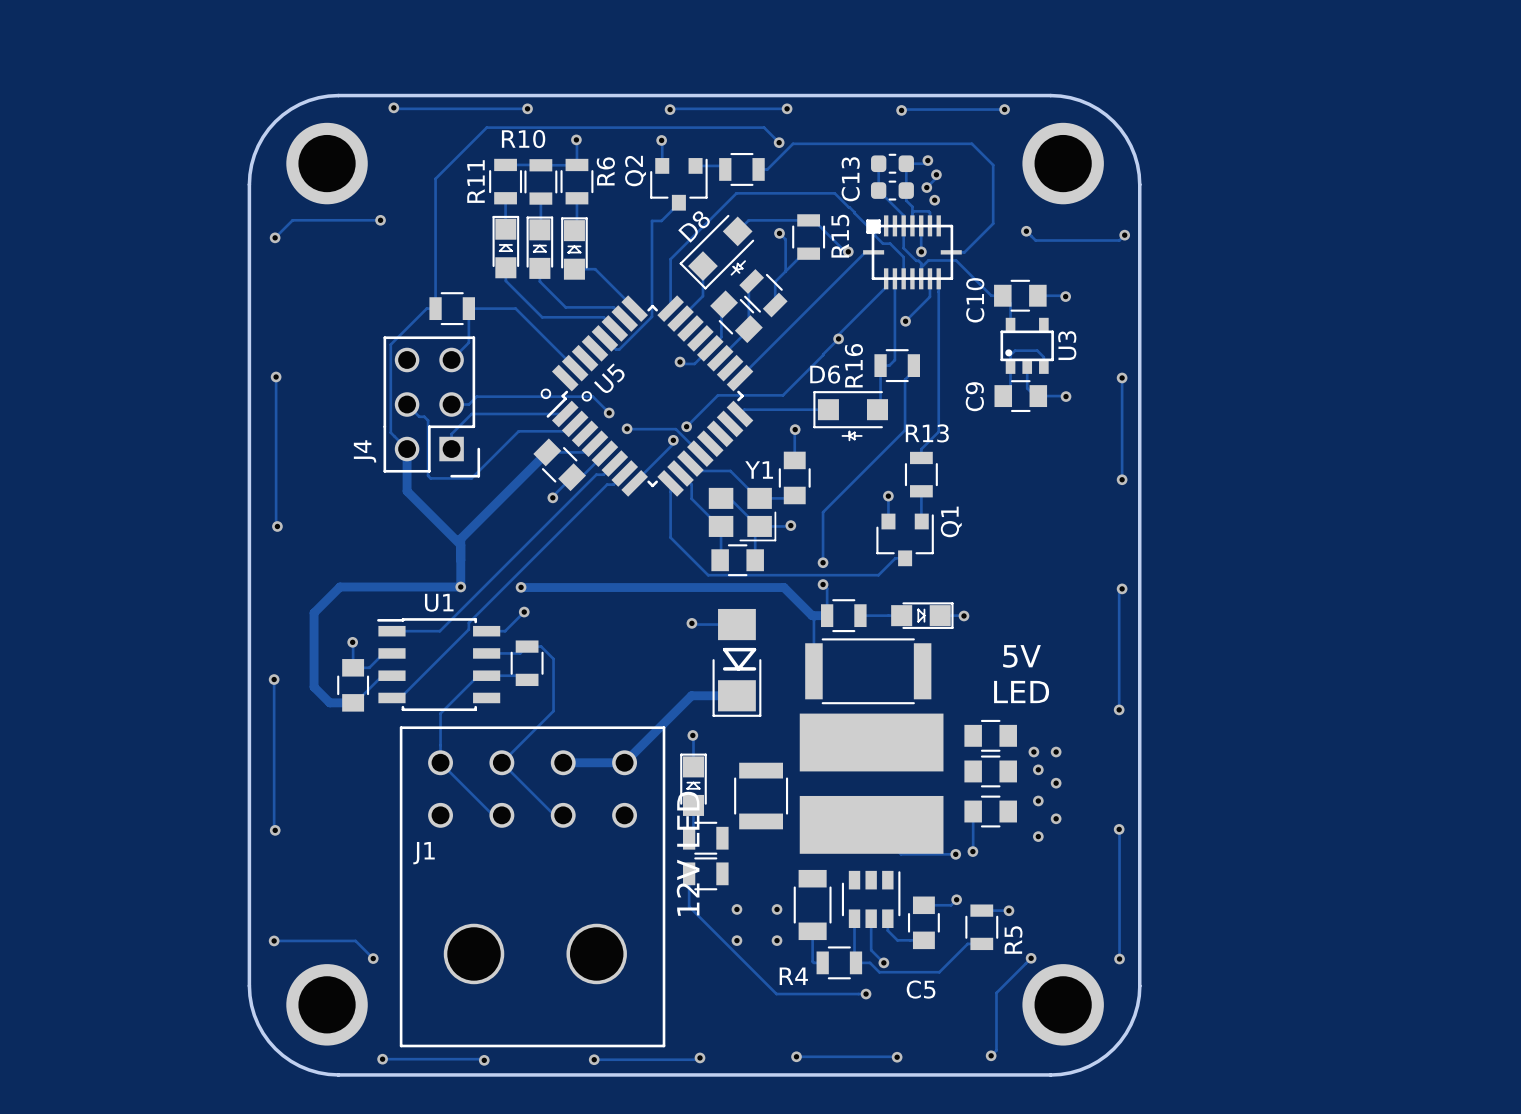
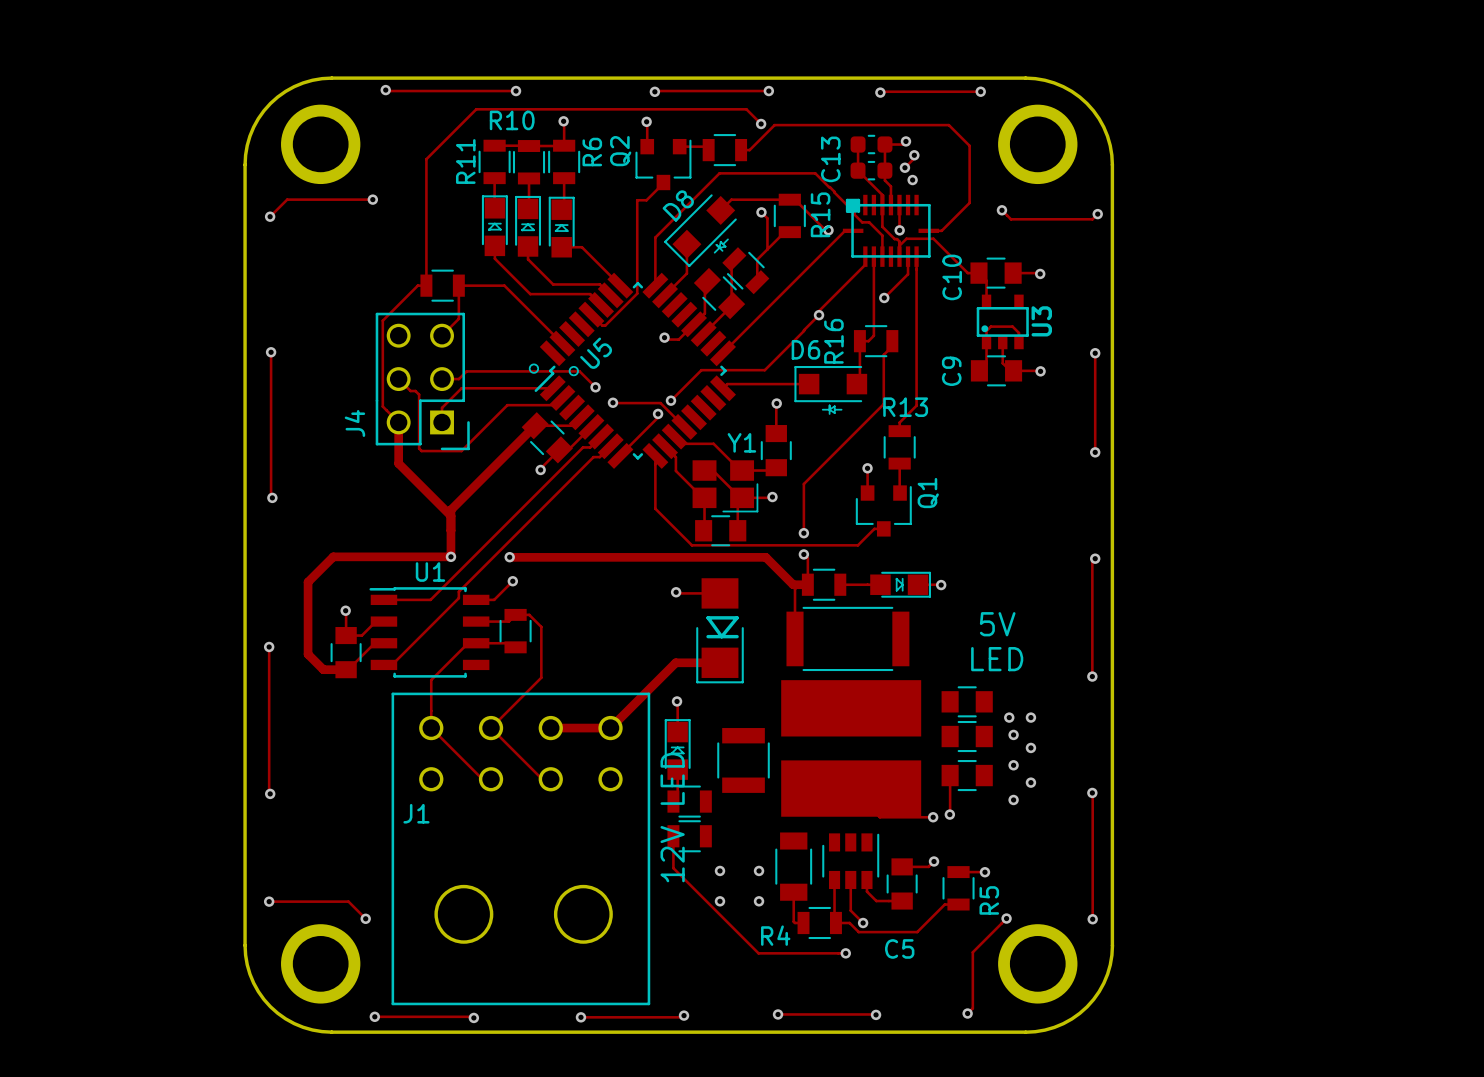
track: (912, 212) (928, 211) (929, 225) (938, 225) -> none

